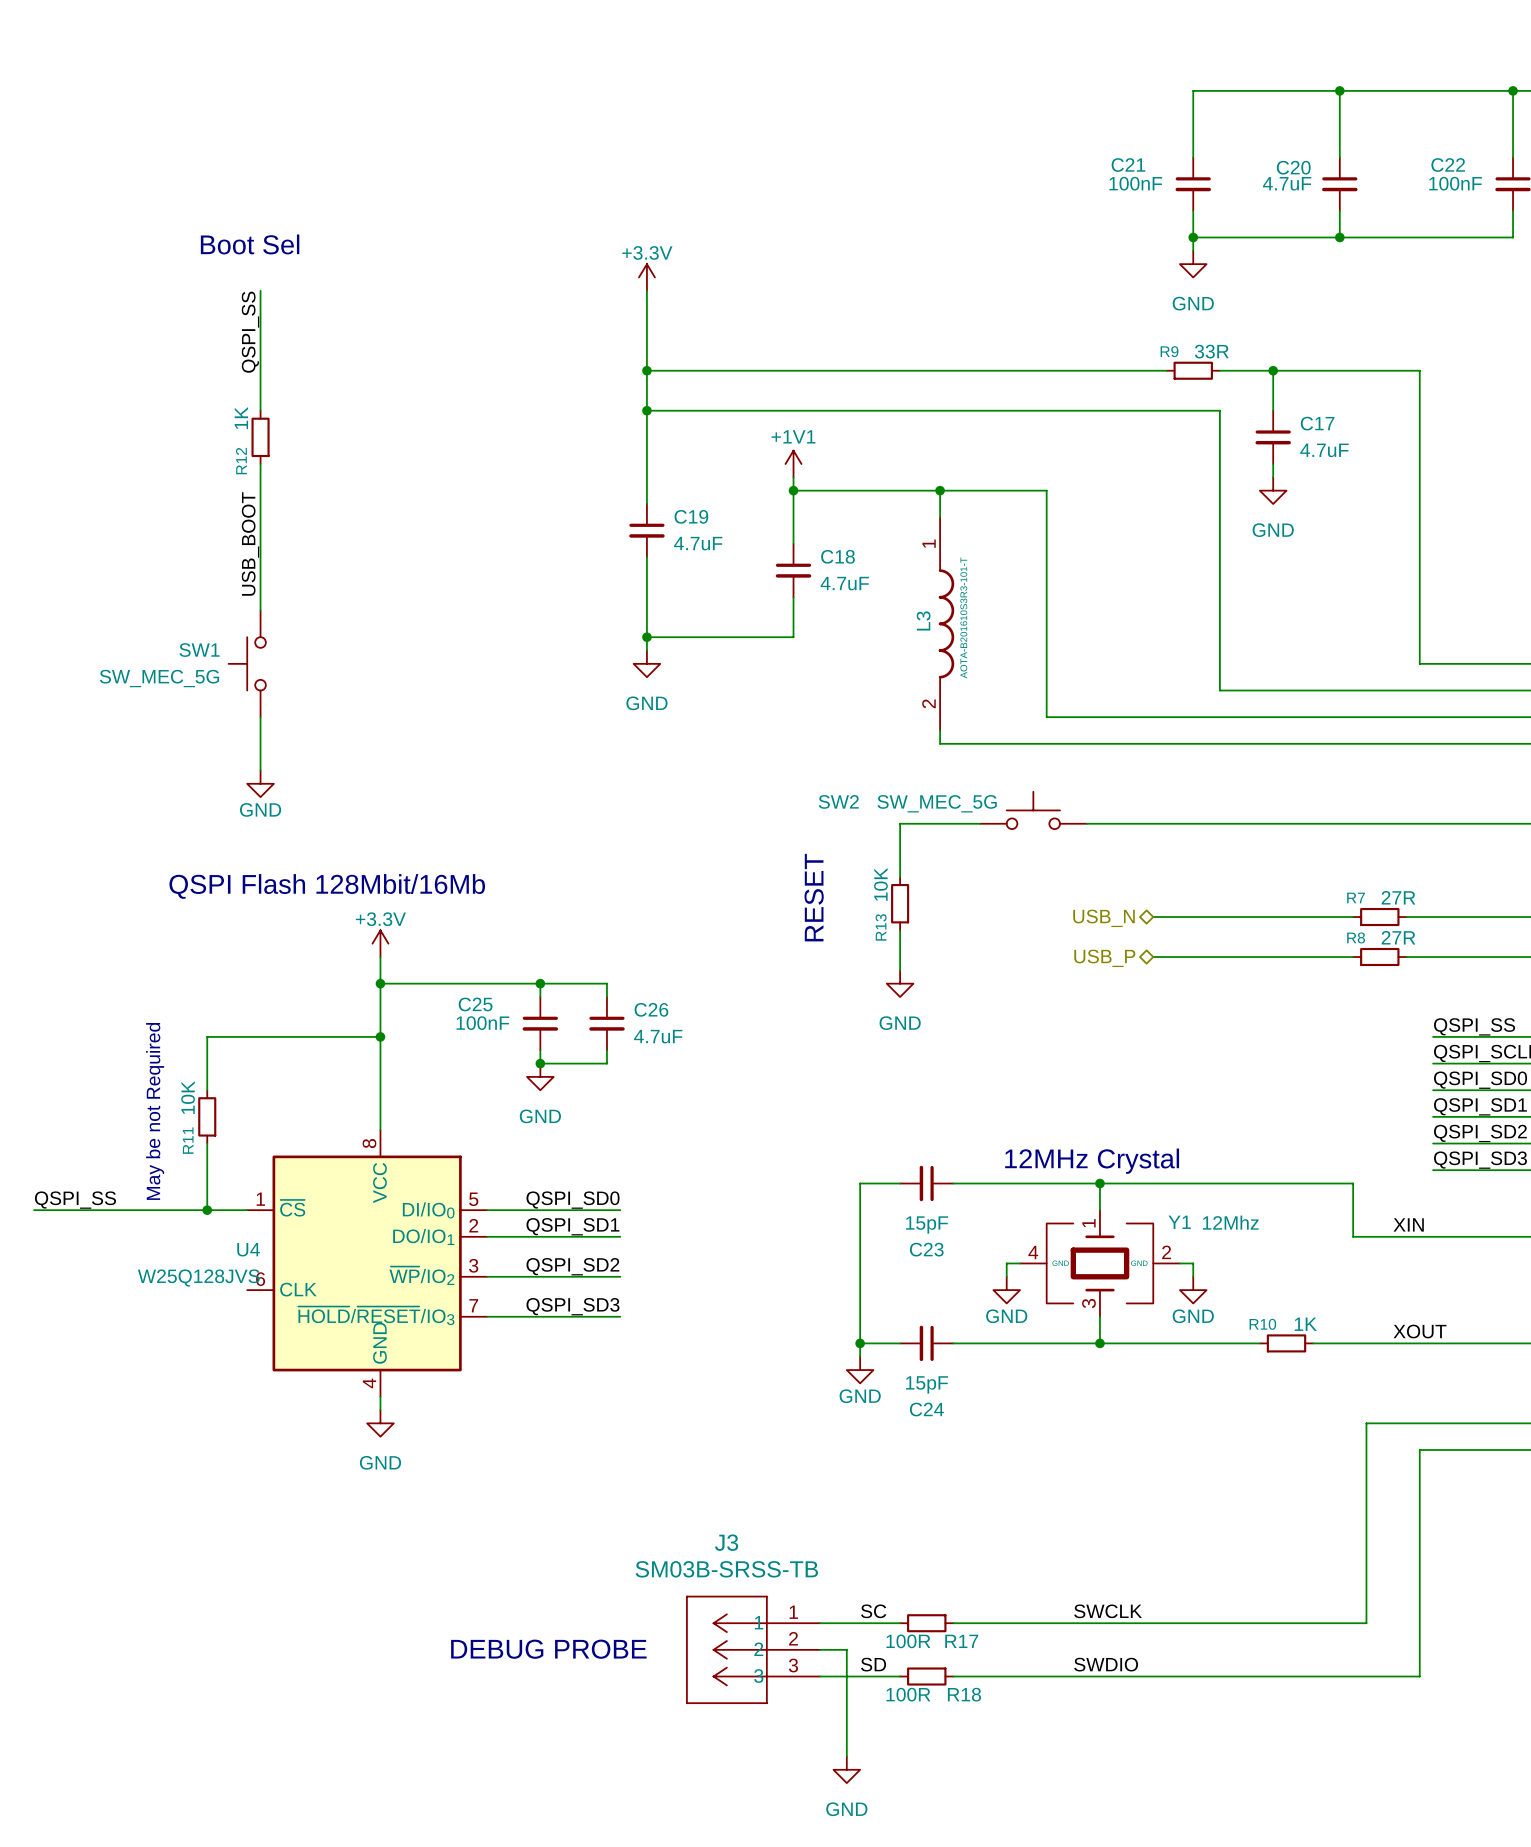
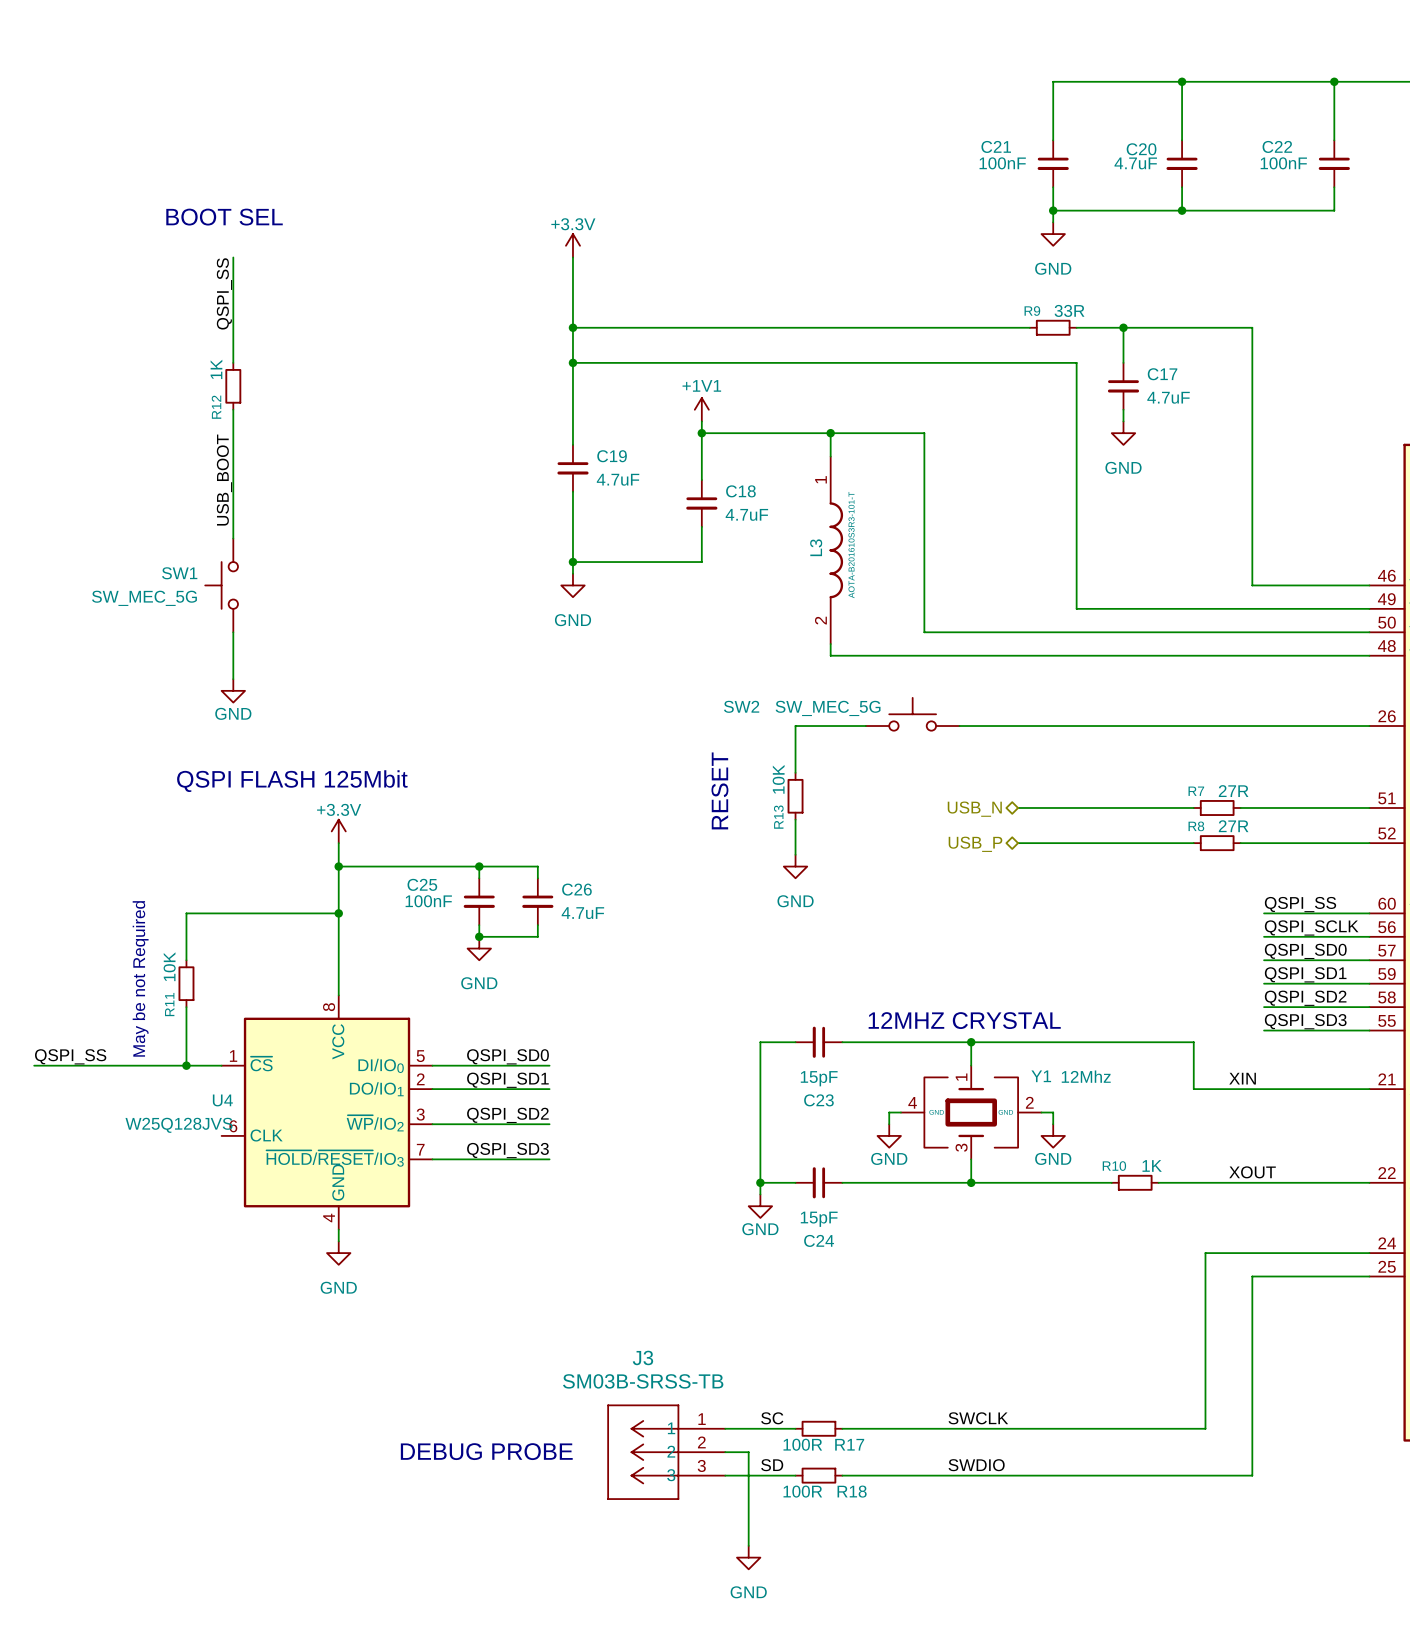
text: Boot Sel (250, 244) -> BOOT SEL (224, 217)
text: QSPI Flash 128Mbit/16Mb (327, 886) -> QSPI FLASH 125Mbit (292, 781)
text: 12MHz Crystal (1092, 1161) -> 12MHZ CRYSTAL (964, 1020)

